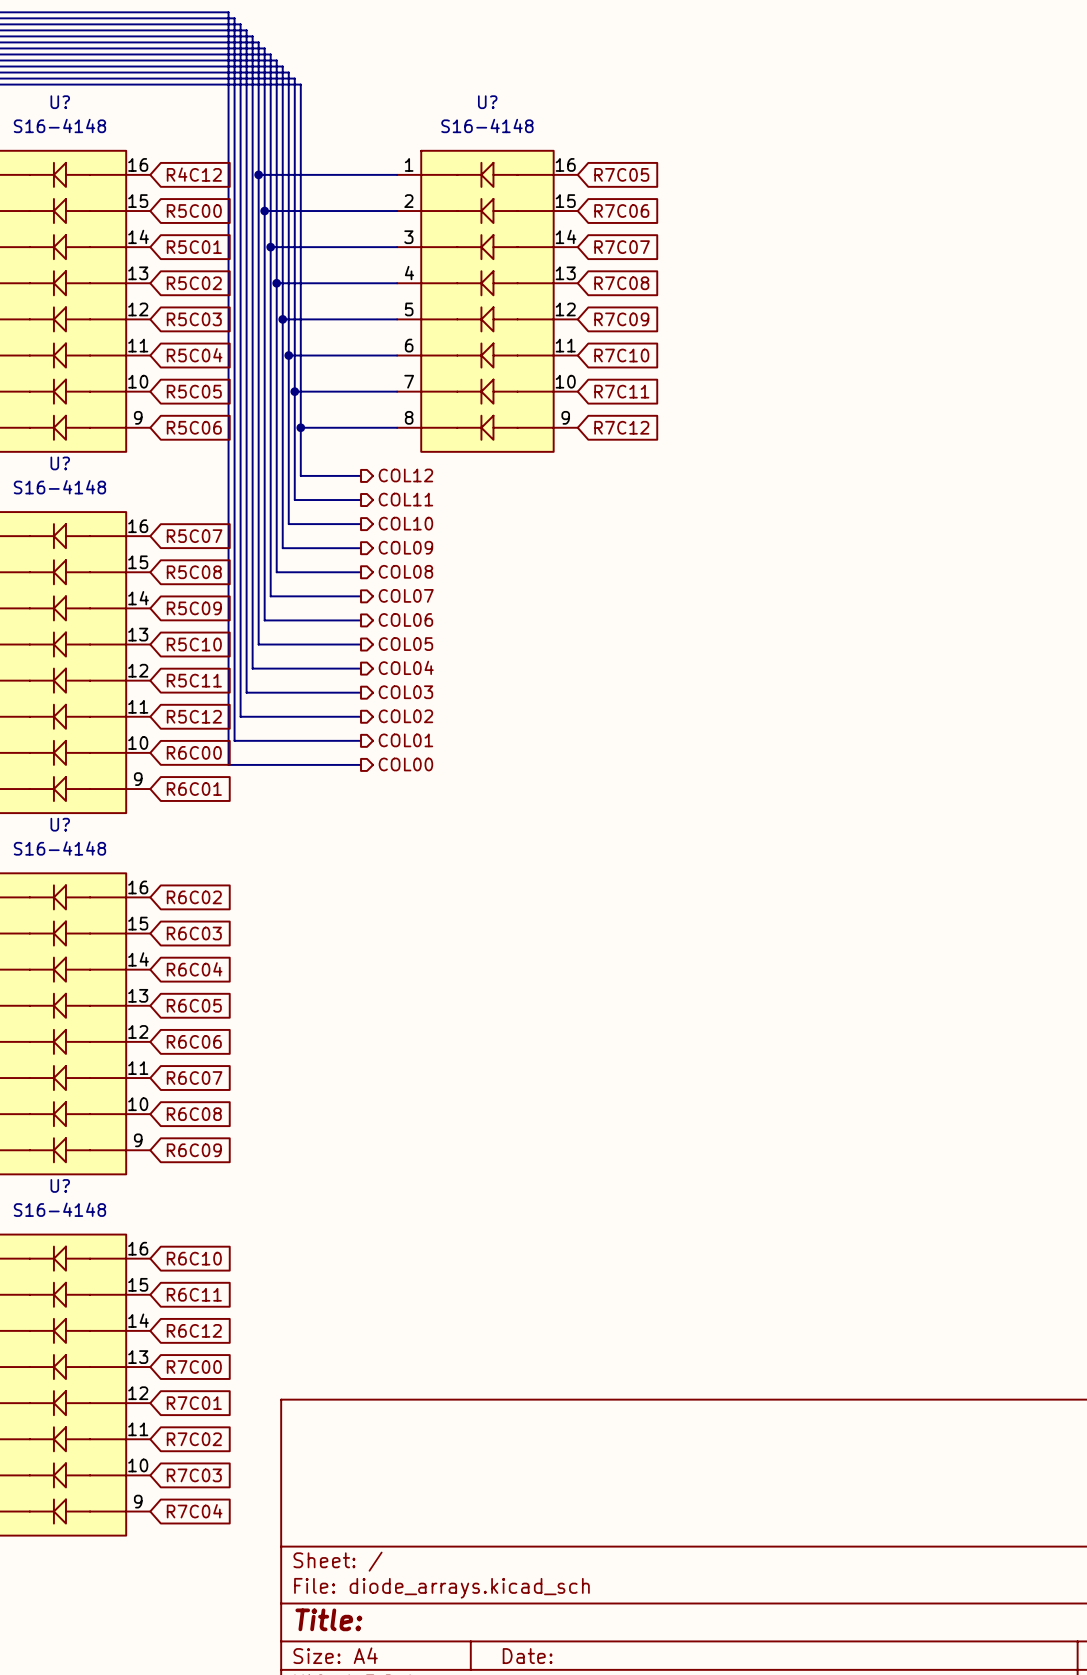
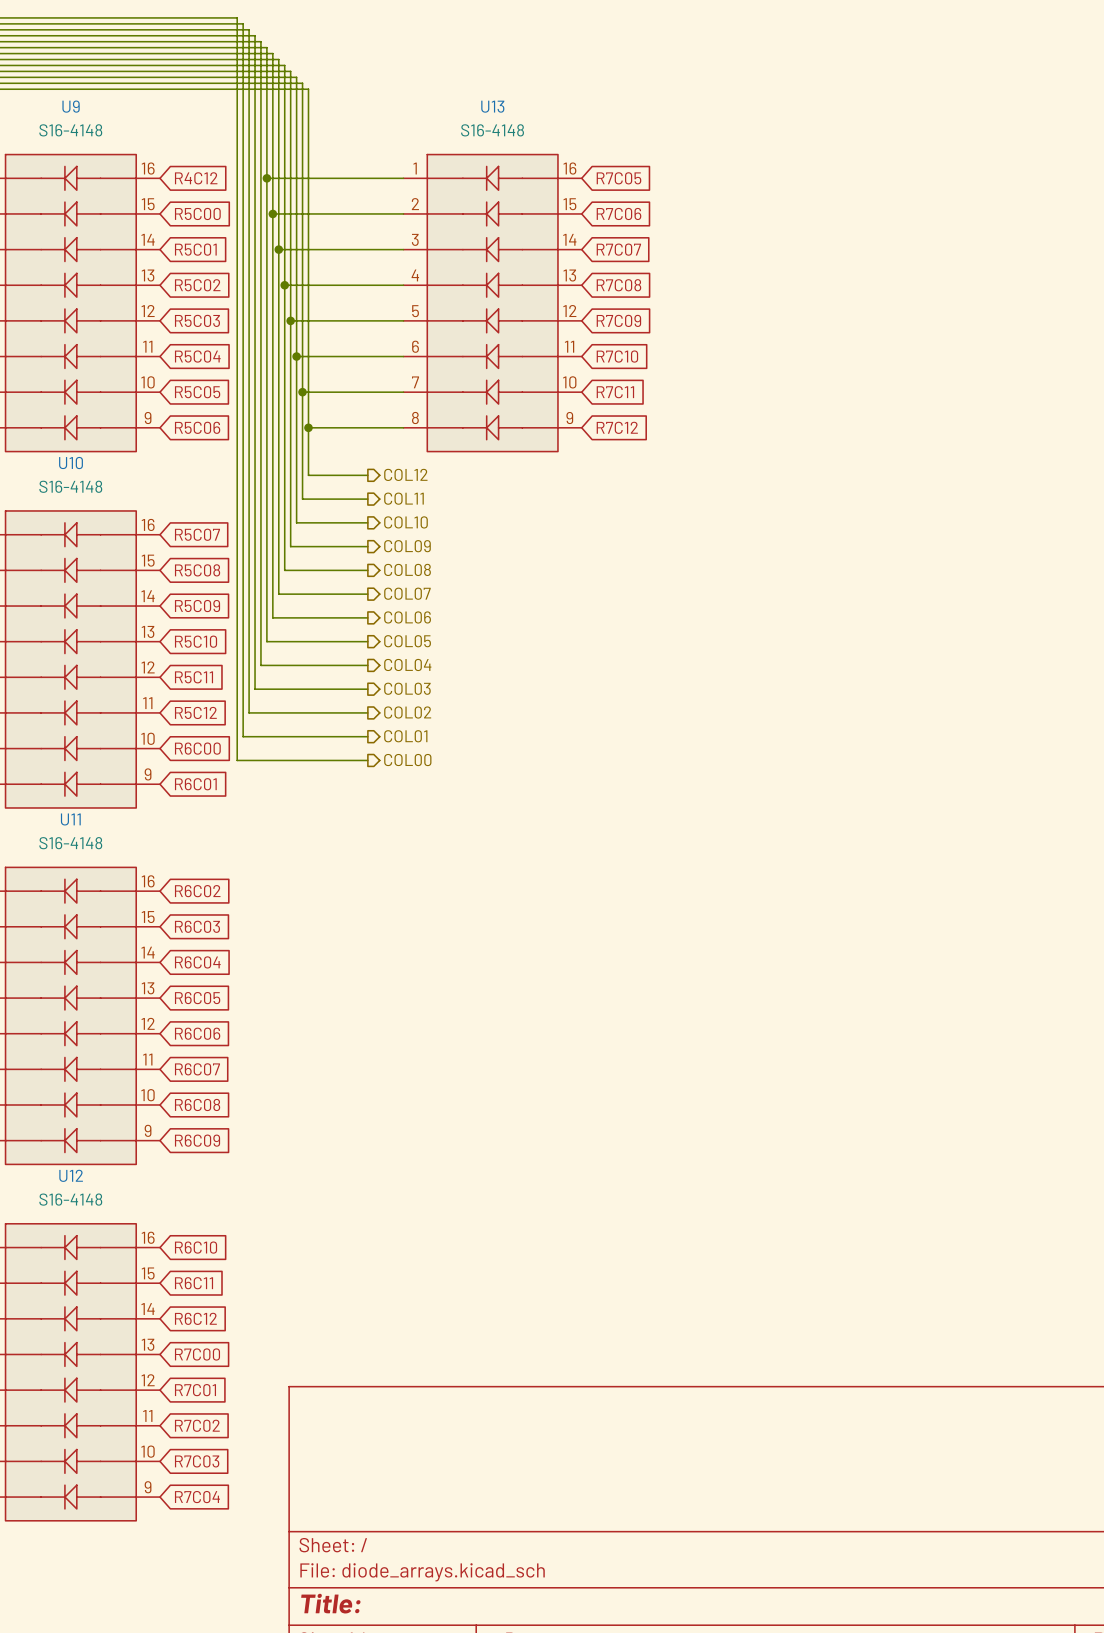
U? name: U? (60, 102) -> U9 (71, 106)
U? name: U? (487, 102) -> U13 (492, 106)
U? name: U? (60, 463) -> U10 (71, 463)
U? name: U? (60, 824) -> U11 (70, 819)
U? name: U? (60, 1185) -> U12 (71, 1175)

